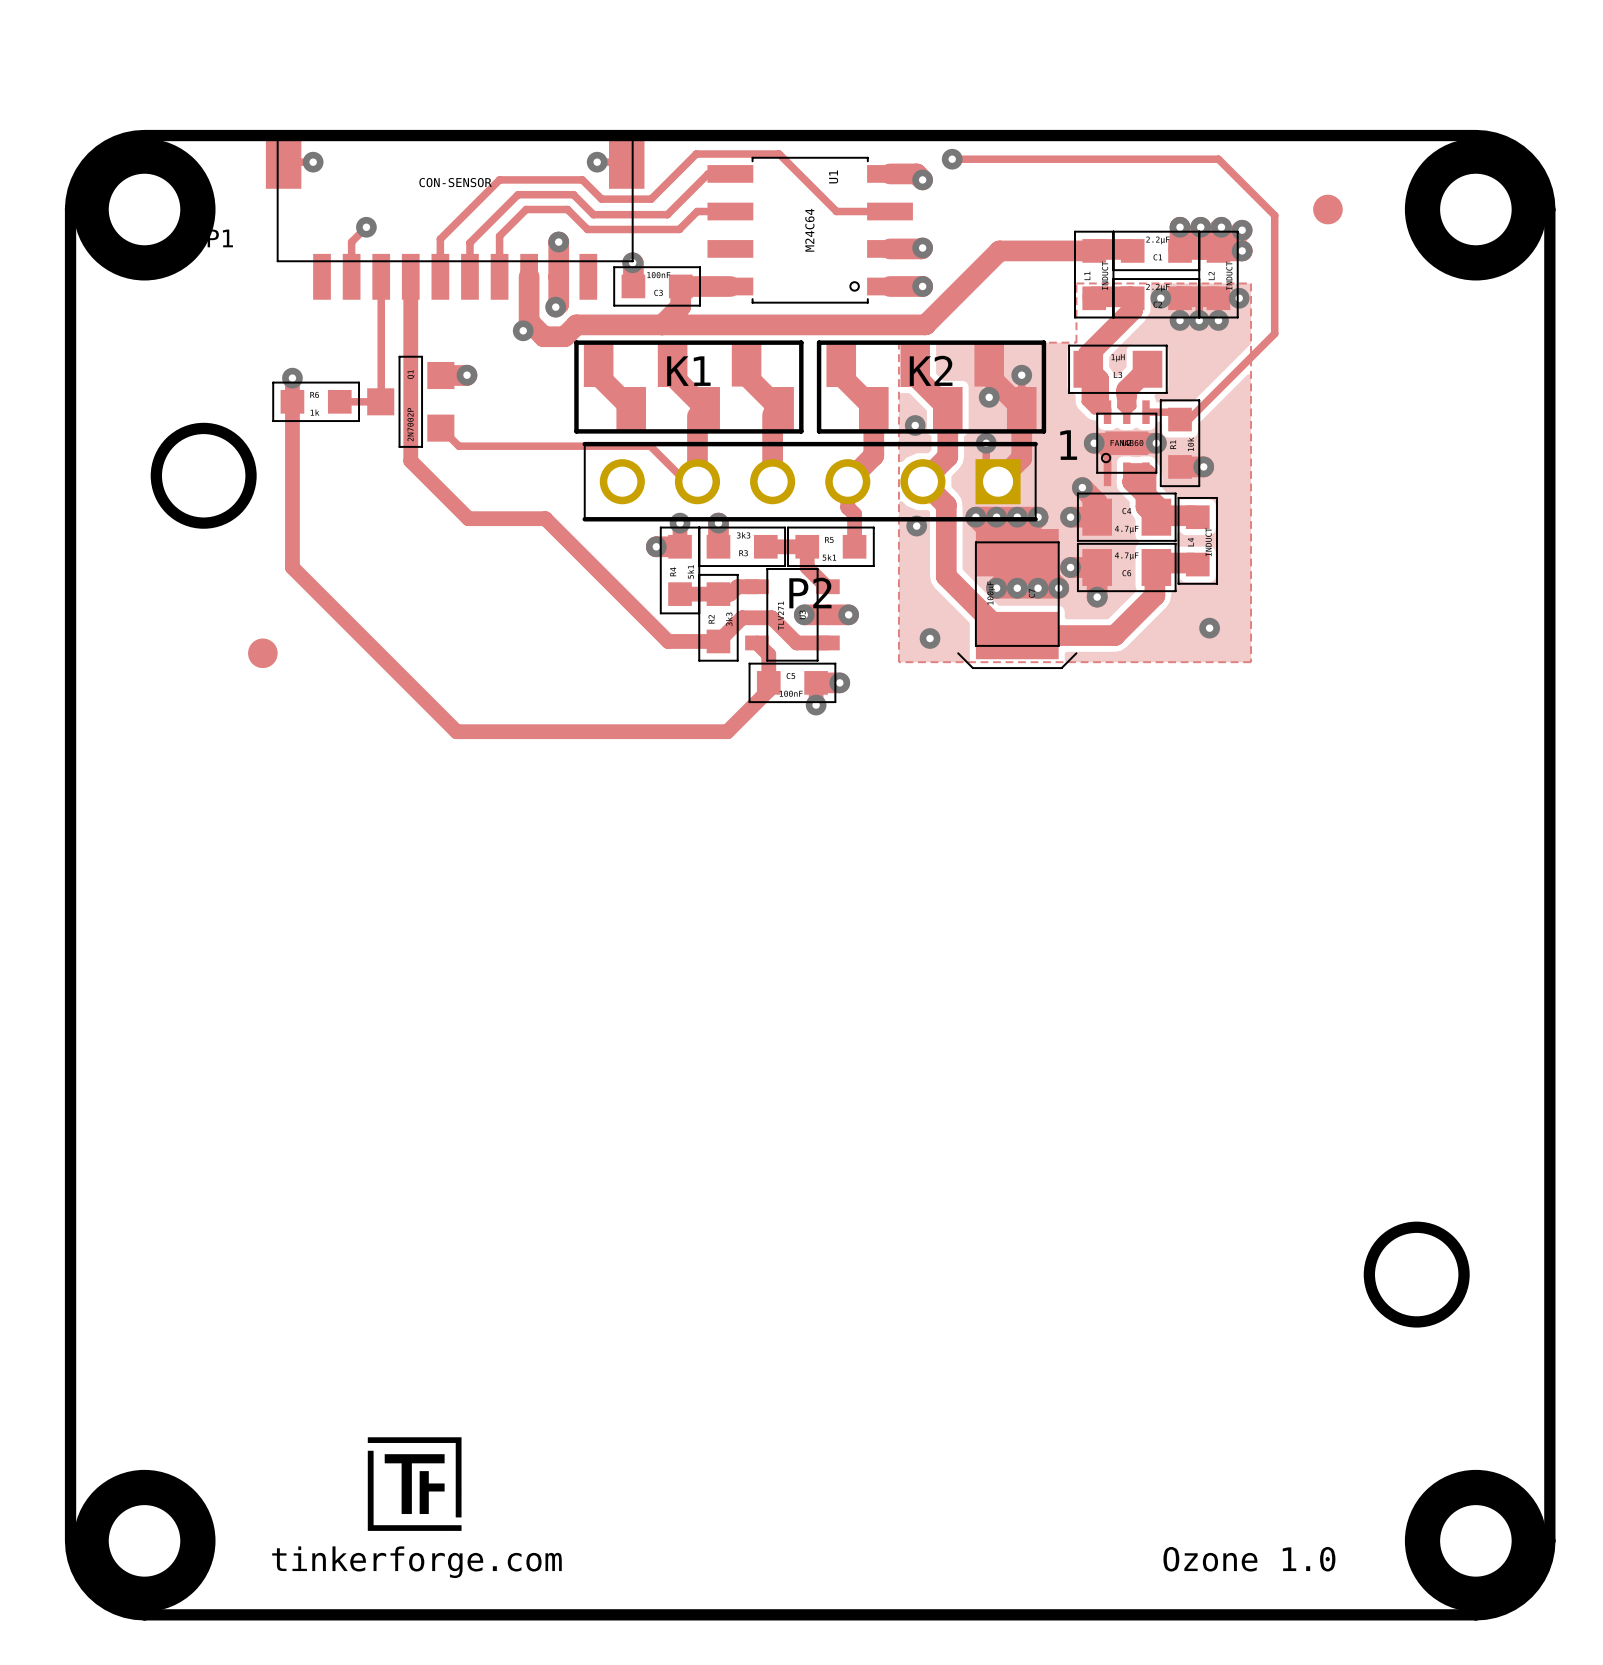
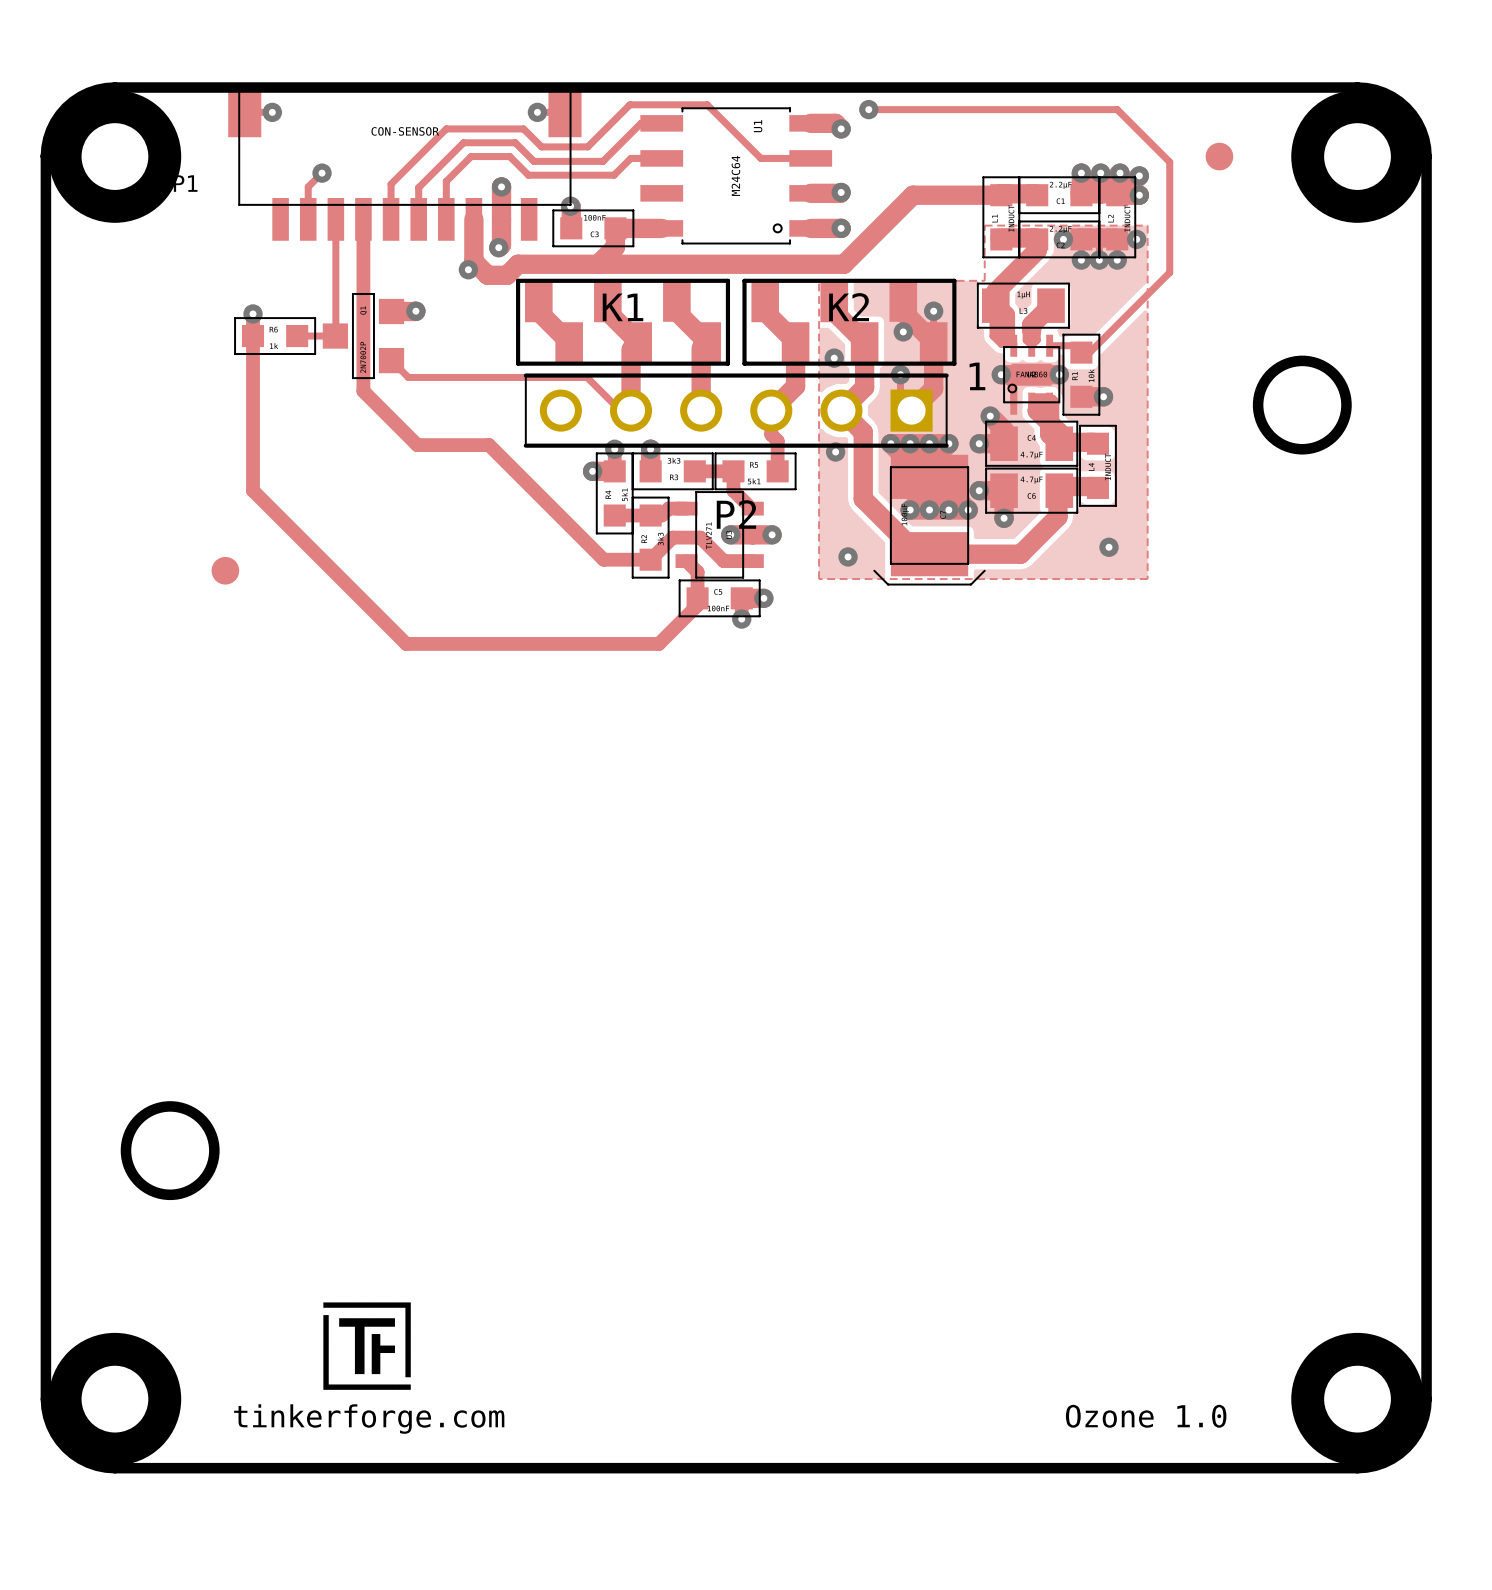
round board edge: [150, 422, 257, 529] -> none
round board edge: none -> [1252, 355, 1352, 455]
round board edge: none -> [120, 1101, 220, 1201]
round board edge: [1363, 1221, 1470, 1328] -> none

